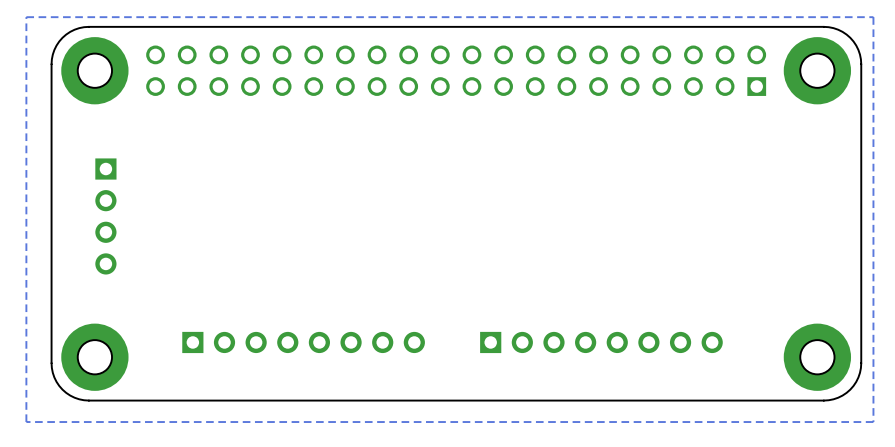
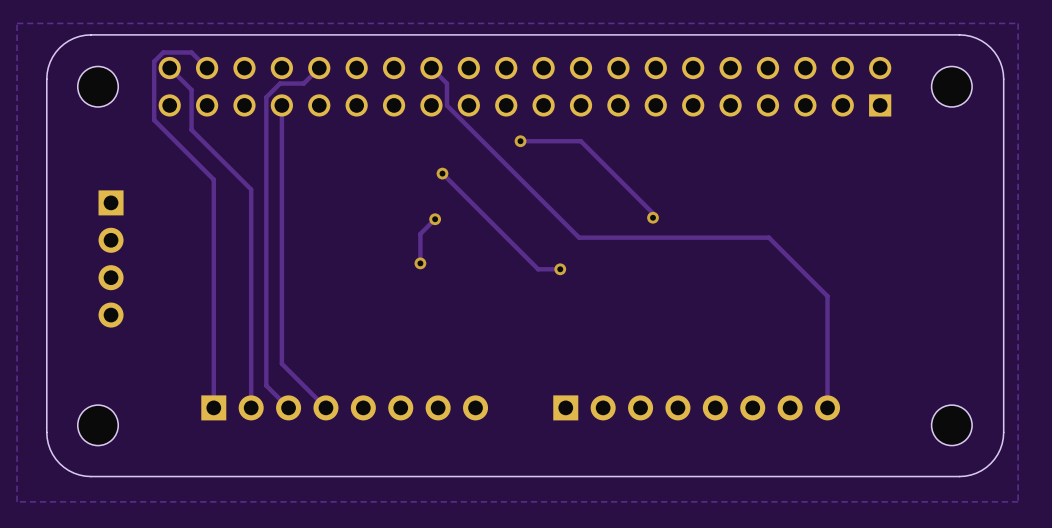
track: none -> (169, 68) (191, 89) (191, 129) (251, 189) (251, 407)
track: none -> (207, 68) (191, 52) (163, 52) (154, 61) (154, 120) (213, 179) (213, 407)
track: none -> (319, 68) (303, 83) (280, 83) (266, 97) (266, 385) (288, 407)
track: none -> (431, 68) (446, 83) (446, 105) (579, 237) (768, 237) (827, 296) (827, 407)
part: (94, 70) -> none
part: (817, 70) -> none
track: none -> (281, 105) (281, 363) (325, 407)
track: none -> (520, 141) (580, 141) (653, 213) (653, 217)
via: none -> (520, 141)
track: none -> (442, 173) (538, 269) (560, 269)
via: none -> (442, 173)
via: none -> (653, 217)
track: none -> (435, 219) (420, 233) (420, 263)
via: none -> (435, 219)
via: none -> (420, 263)
via: none -> (560, 269)
part: (94, 357) -> none
part: (817, 357) -> none

